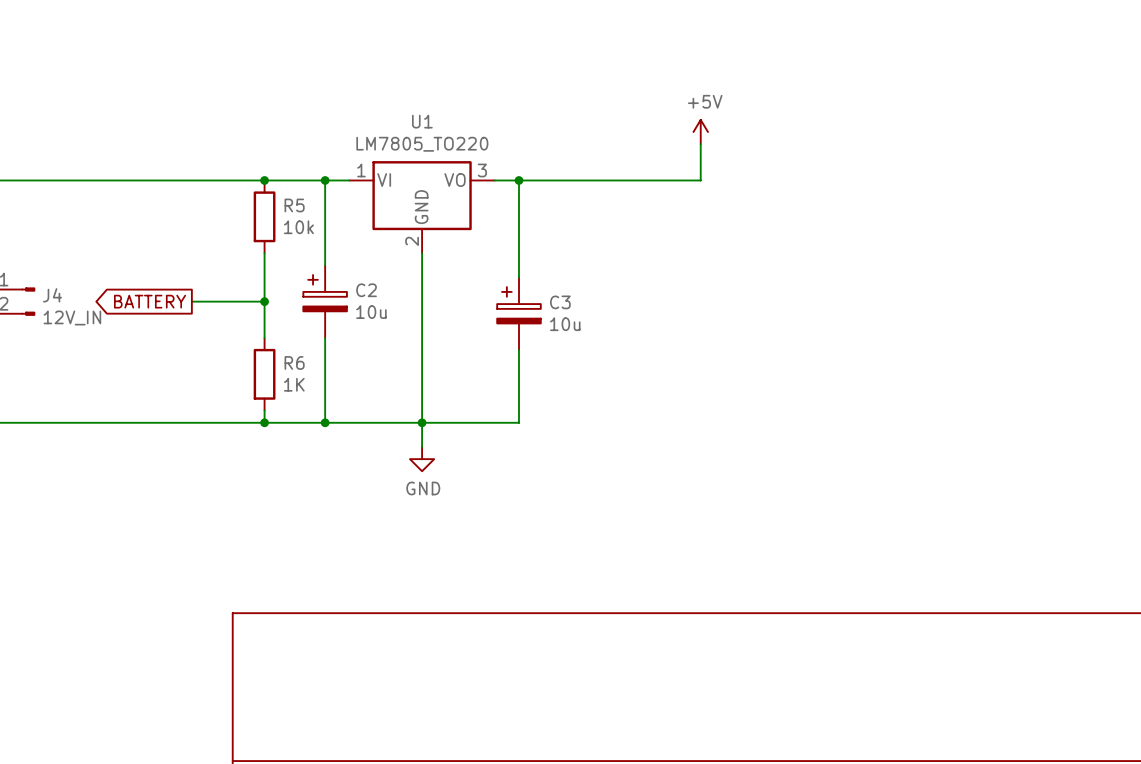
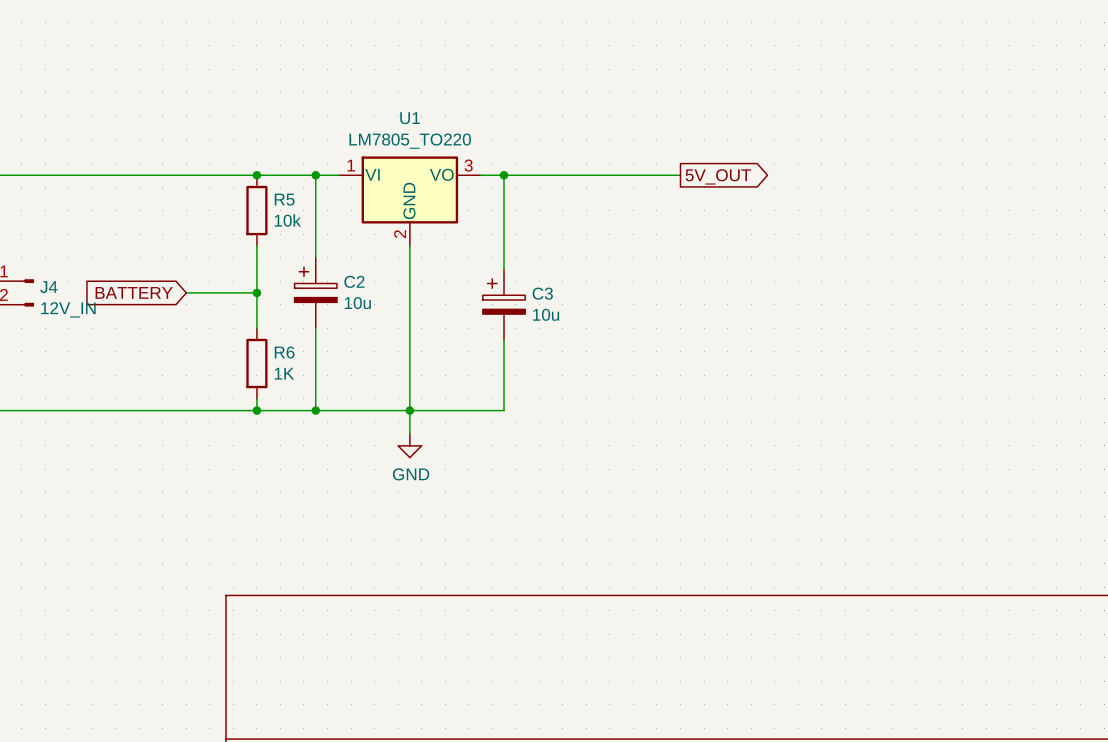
power symbol: +5V (700, 132) -> none
wire: (700, 144) (700, 180) -> none
global label: none -> 5V_OUT (718, 176)
global label shape: output (150, 301) -> input (134, 292)

